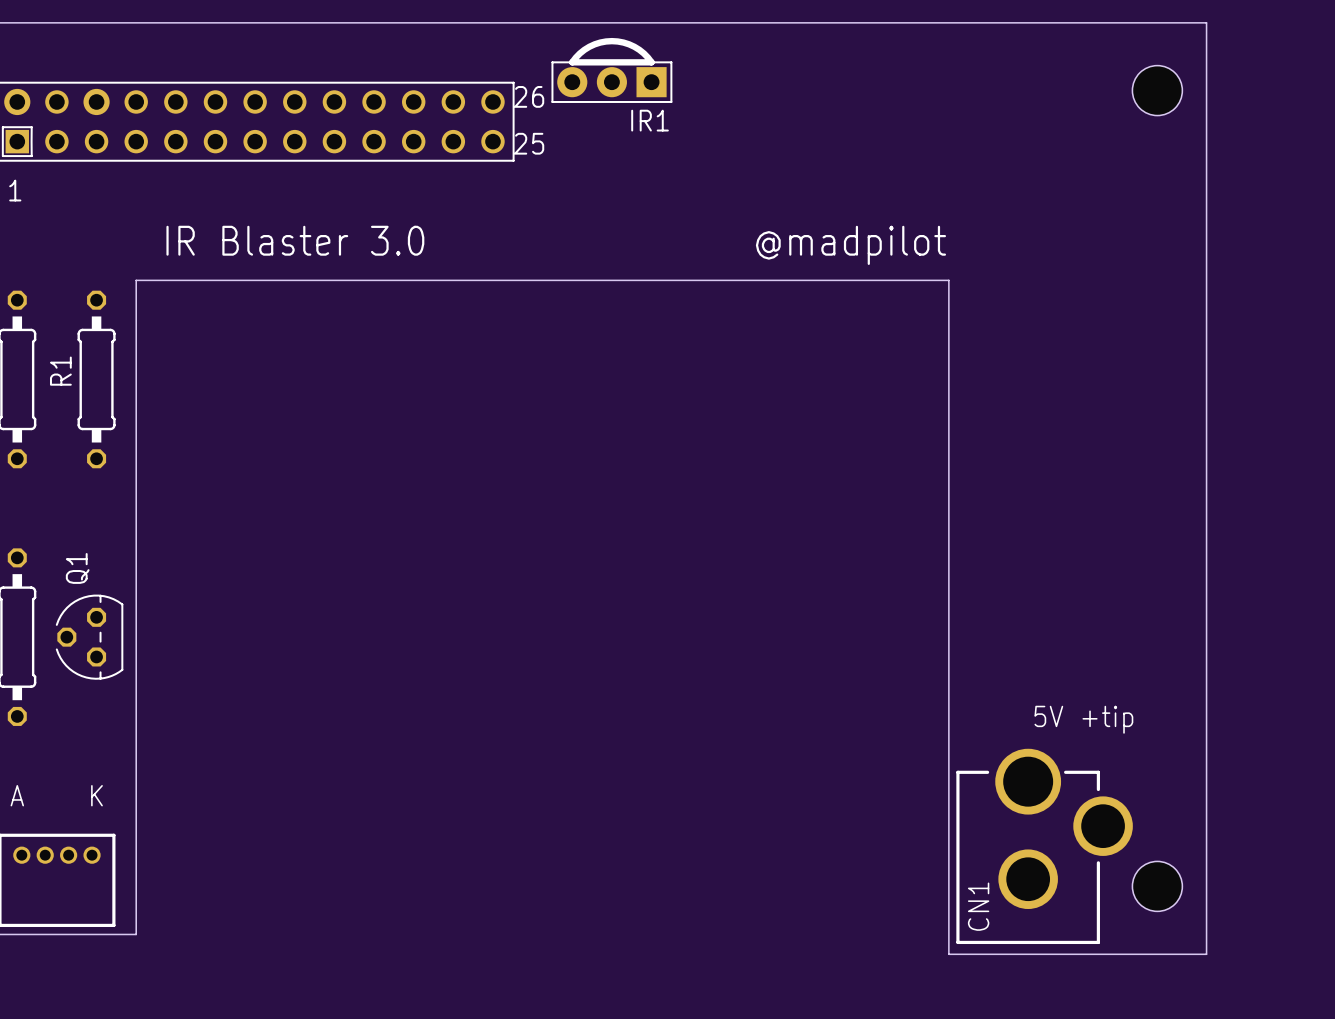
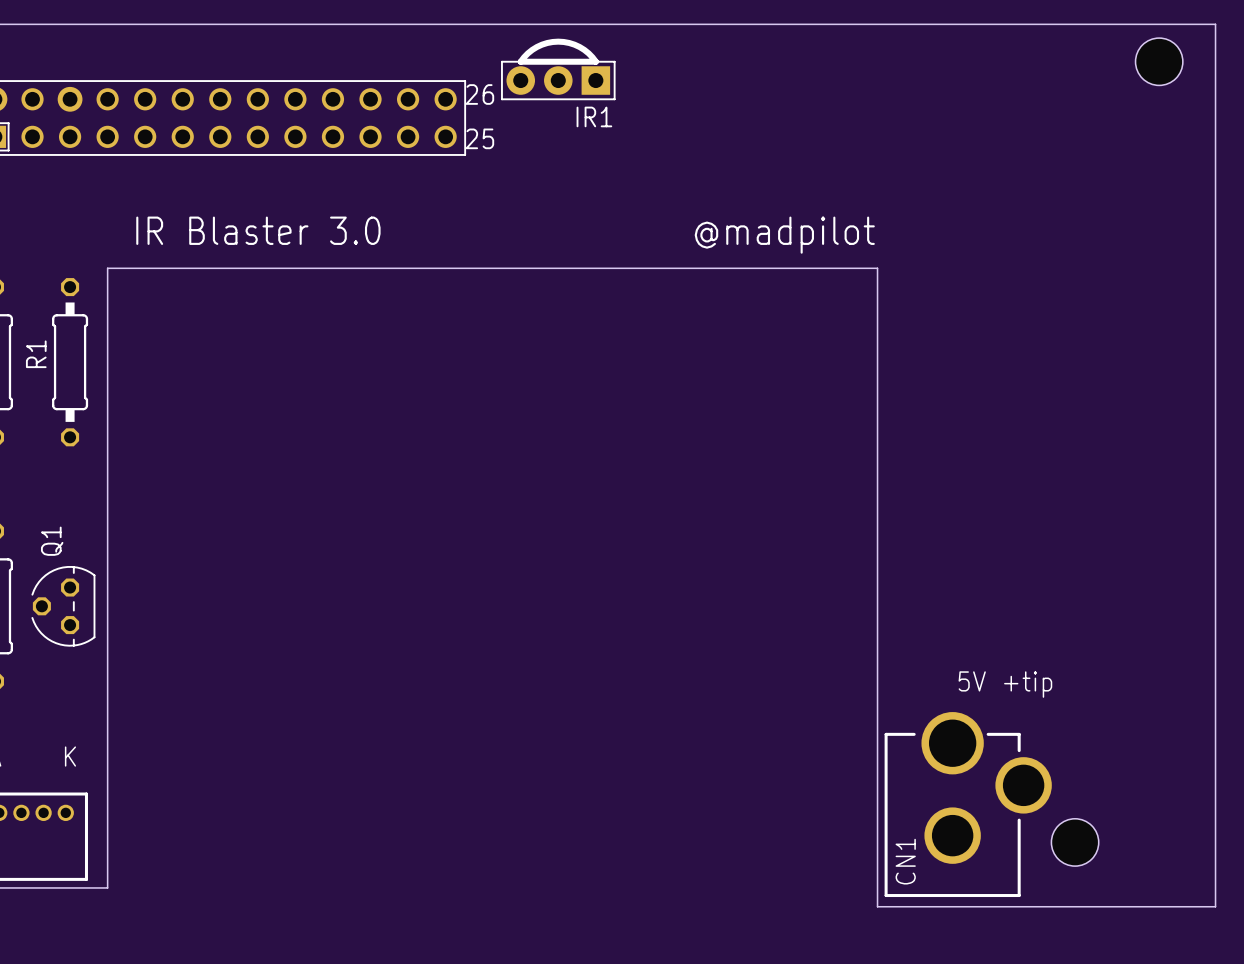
board edge: (1206, 22) (1206, 954) -> (1121, 24) (1215, 24) (1215, 906) (1121, 906)
hole position: (1157, 90) -> (1159, 61)

